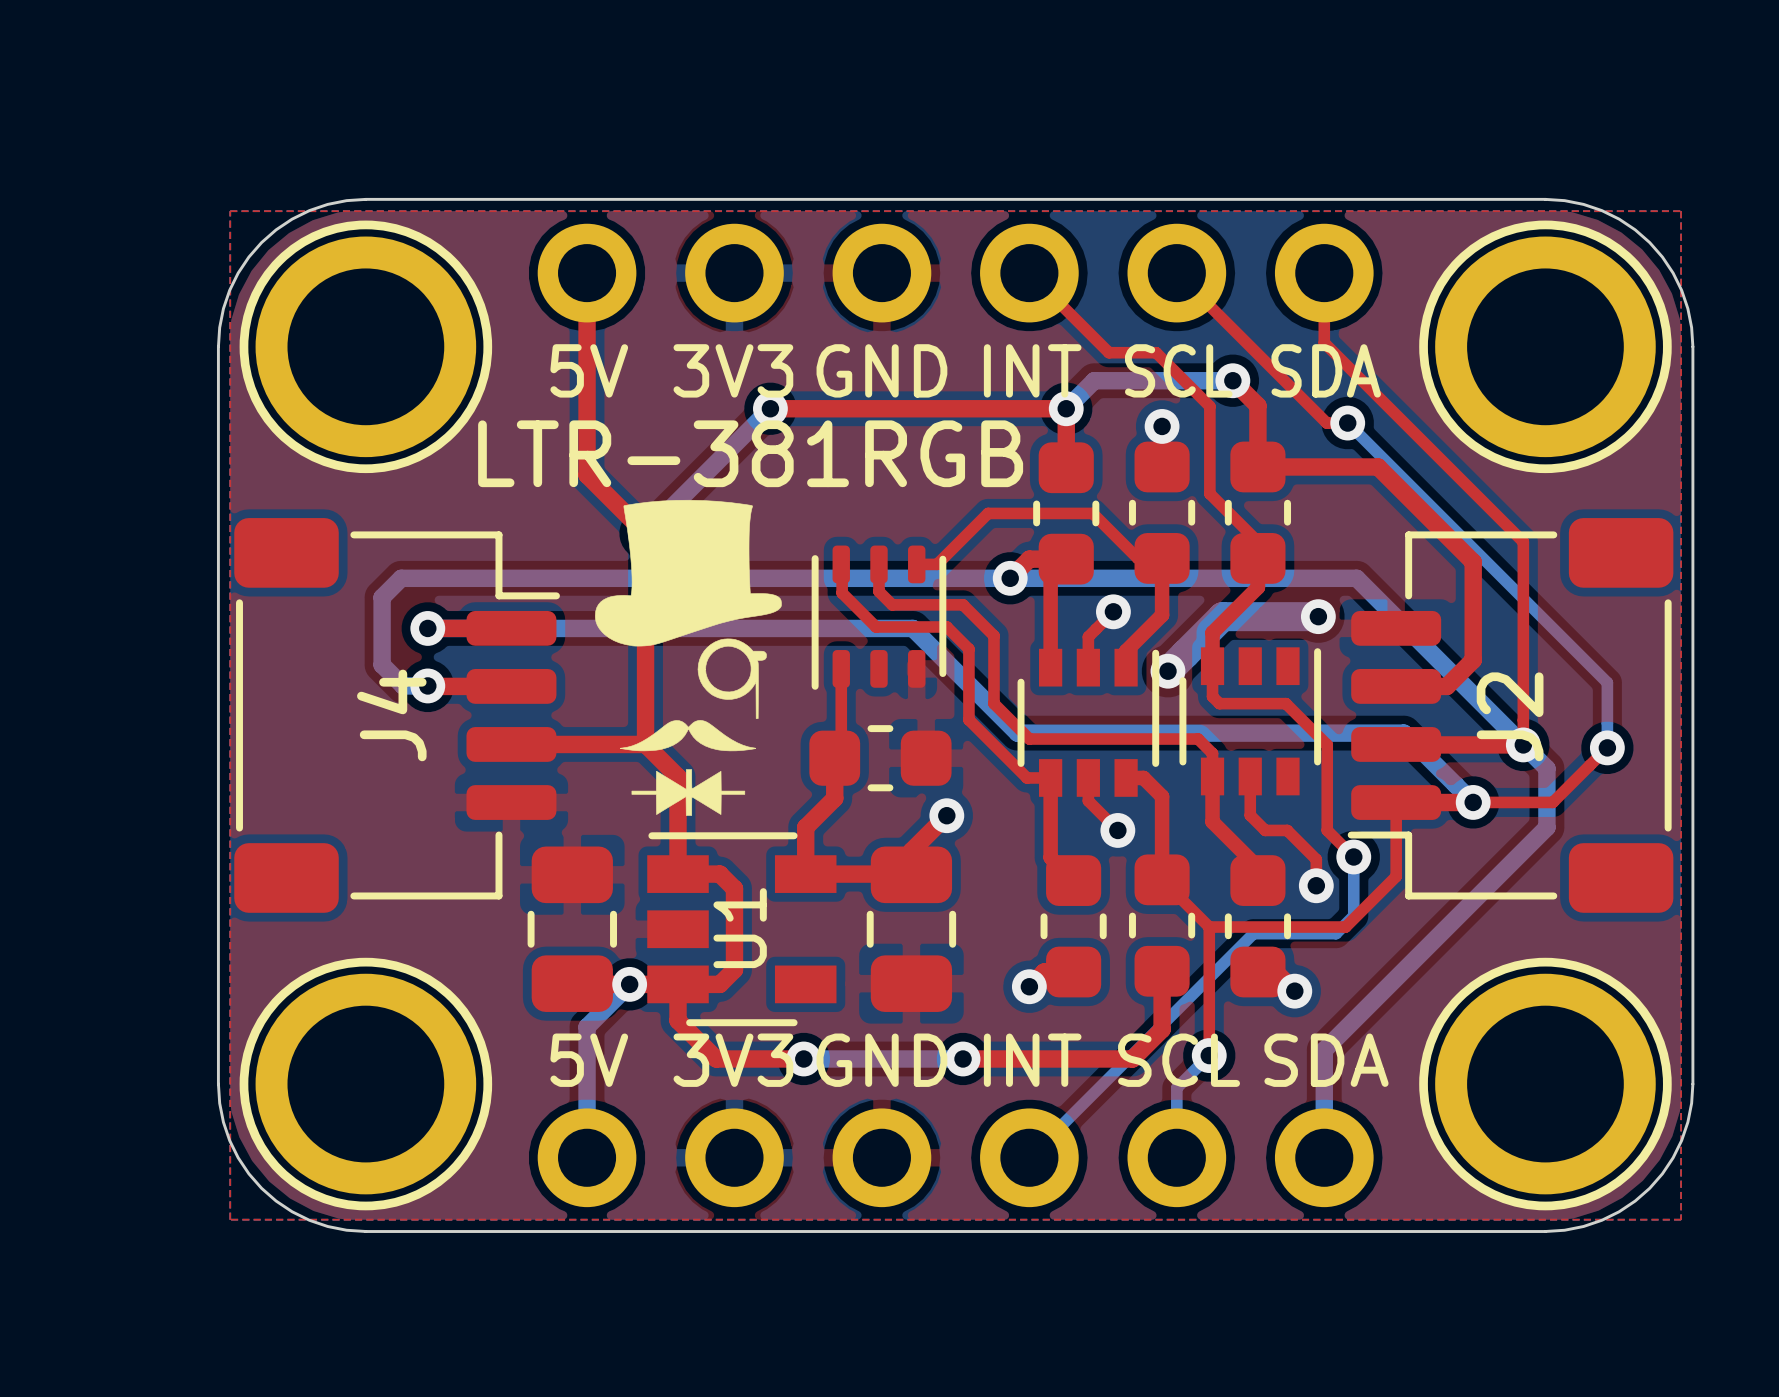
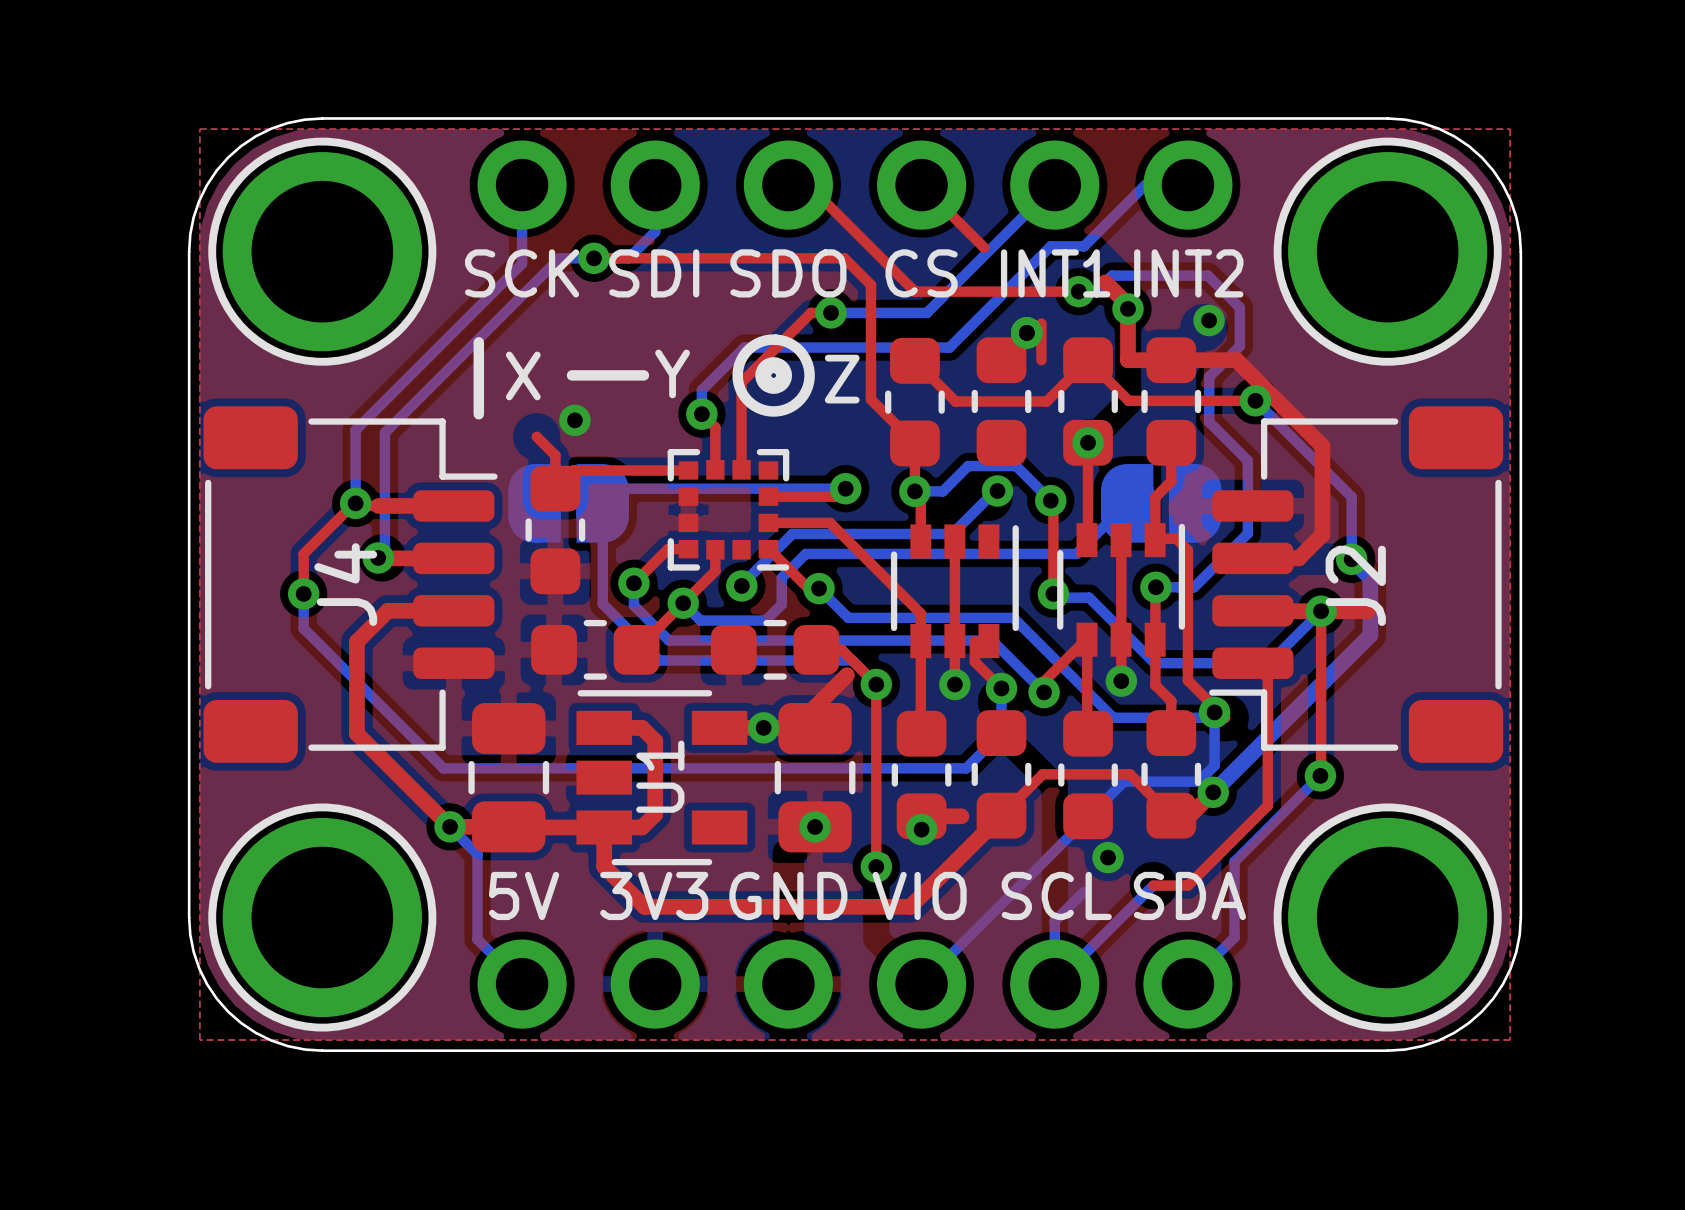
bottom track: none -> (522, 185) (522, 263) (355, 430) (355, 503)
top track: (587, 273) (587, 475) (645, 533) (645, 744) -> none
bottom track: none -> (655, 185) (655, 231) (628, 258) (559, 258) (384, 432) (384, 555) (382, 557)
top track: none -> (788, 185) (808, 185) (914, 291) (1078, 291)
bottom track: none -> (1054, 185) (926, 312) (831, 312)
top track: (1176, 273) (1326, 423) (1347, 423) -> none
bottom track: none -> (1187, 185) (1145, 185) (1084, 246) (1050, 246) (949, 347) (744, 347) (701, 390) (701, 414)
top track: (1324, 273) (1324, 342) (1523, 541) (1523, 744) -> none
top track: (1098, 342) (1109, 352) (1156, 352) (1209, 406) (1209, 493) (1257, 541) (1257, 587) (1212, 632) (1212, 696) (1219, 703) (1285, 703) (1327, 744) (1327, 830) (1353, 856) -> none
top track: none -> (593, 258) (844, 258) (870, 284) (870, 399) (914, 443) (914, 491) (920, 497) (920, 541)
via: none -> (593, 258)
text: 5V (589, 370) -> SCK (522, 273)
text: 3V3 (733, 370) -> SDI (654, 273)
text: GND (881, 370) -> SDO (788, 273)
text: INT (1032, 370) -> CS (921, 273)
text: SCL (1178, 370) -> INT1 (1055, 273)
text: SDA (1326, 370) -> INT2 (1188, 273)
bottom track: (1232, 380) (1094, 380) (1066, 408) -> none
via: (1232, 380) -> none
bottom track: none -> (1078, 291) (1096, 291) (1112, 275) (1207, 275) (1239, 307) (1239, 346) (1209, 376) (1209, 422) (1247, 460) (1247, 533) (1194, 587) (1155, 587)
via: none -> (1078, 291)
bottom track: (770, 408) (645, 533) -> none
top track: (770, 408) (1066, 408) (1066, 467) -> none
via: (770, 408) -> none
via: (1066, 408) -> none
via: none -> (1128, 308)
top track: none -> (831, 312) (811, 312) (741, 382) (741, 469)
via: none -> (831, 312)
bottom track: (1347, 423) (1607, 682) (1607, 747) -> none
via position: (1162, 426) -> (1026, 332)
line: none -> (774, 339) (761, 341) (749, 349) (741, 360) (737, 373) (739, 387) (746, 399) (758, 407) (771, 411) (785, 409) (797, 402) (805, 391) (809, 377) (807, 364) (800, 351) (789, 343) (776, 339)
line: none -> (478, 342) (478, 414)
drawing: none -> [755, 357, 792, 394]
top track: none -> (914, 360) (955, 401) (1046, 401) (1088, 360) (1128, 400) (1255, 400)
text: none -> Y (672, 373)
line: none -> (572, 375) (643, 375)
text: none -> X (523, 375)
text: none -> Z (842, 379)
drawing: [594, 499, 782, 816] -> none
bottom track: none -> (1255, 400) (1351, 497) (1351, 559) (1370, 577) (1370, 635) (1213, 792)
via: none -> (1255, 400)
part: none -> (1001, 401)
part: (1162, 512) -> none
part: none -> (1088, 401)
part: (1257, 512) -> none
part: none -> (1171, 401)
part: none -> (914, 402)
part: (1066, 513) -> none
top track: none -> (701, 414) (715, 427) (715, 469)
via: none -> (701, 414)
top track: none -> (536, 436) (555, 455) (555, 488) (573, 470) (688, 470)
top track: none -> (1088, 442) (1087, 538)
via: none -> (1088, 442)
top track: none -> (1171, 442) (1171, 481) (1155, 497) (1155, 538) (1176, 538) (1187, 550) (1187, 680) (1225, 717)
top track: (841, 564) (842, 593) (876, 626) (946, 626) (968, 649) (968, 719) (1027, 777) (1050, 777) (1050, 857) (1073, 880) -> none
top track: (878, 564) (878, 591) (892, 604) (963, 604) (993, 635) (993, 703) (1029, 739) (1198, 739) (1212, 753) (1212, 821) (1257, 867) (1257, 880) -> none
top track: (916, 564) (937, 564) (988, 513) (1092, 513) (1137, 558) (1162, 558) (1162, 615) (1126, 651) (1126, 667) -> none
top track: (1010, 578) (1029, 559) (1066, 559) (1050, 574) (1050, 667) -> none
via position: (1010, 578) -> (914, 491)
bottom track: none -> (845, 488) (617, 488) (602, 503) (602, 604) (659, 660) (852, 660) (876, 684)
top track: none -> (845, 488) (837, 496) (768, 496)
via: none -> (845, 488)
top track: (1113, 611) (1088, 636) (1088, 667) -> none
bottom track: none -> (914, 491) (942, 491) (968, 466) (1016, 466) (1050, 500)
bottom track: (1318, 616) (1222, 616) (1167, 671) -> none
via: (1318, 616) -> none
LTR-381RGB: (878, 617) -> none
bottom track: none -> (988, 497) (952, 533) (792, 533) (741, 585)
top track: none -> (1050, 500) (1053, 503) (1053, 593)
via: none -> (1050, 500)
part: none -> (568, 503)
bottom track: none -> (1127, 503) (1076, 553) (805, 553) (781, 577) (781, 604) (765, 620) (700, 620) (683, 603)
part: none -> (1161, 503)
bottom track: (427, 628) (912, 628) (1017, 733) (1403, 733) (1473, 802) -> none
top track: none -> (378, 505) (351, 505) (303, 553) (303, 593)
via position: (427, 628) -> (355, 503)
part: none -> (728, 509)
top track: none -> (768, 522) (830, 522) (920, 613) (921, 733)
part: none -> (555, 529)
top track: none -> (1121, 538) (1121, 681)
top track: none -> (954, 541) (954, 684)
top track: (841, 668) (841, 751) (834, 757) (834, 798) (805, 827) (805, 874) -> none
via: (1167, 671) -> none
top track: none -> (688, 549) (668, 549) (633, 583)
top track: none -> (715, 549) (715, 571) (636, 649)
top track: none -> (769, 549) (808, 588) (819, 588)
bottom track: (427, 685) (403, 685) (382, 664) (382, 597) (401, 578) (1356, 578) (1546, 768) (1546, 827) (1324, 1050) (1324, 1157) -> (1320, 775) (1234, 861) (1234, 937) (1187, 984)
via: none -> (1351, 559)
bottom track: none -> (633, 583) (633, 605) (668, 640) (992, 640) (1044, 692)
via: none -> (633, 583)
via: none -> (741, 585)
top track: none -> (1155, 587) (1155, 685) (1171, 701) (1171, 733)
via: none -> (1155, 587)
bottom track: none -> (819, 588) (848, 617) (1013, 617) (1113, 717) (1225, 717)
via: none -> (819, 588)
part position: (1088, 722) -> (954, 591)
bottom track: none -> (303, 593) (303, 628) (443, 768) (966, 768) (1001, 733) (1001, 701)
via: none -> (303, 593)
bottom track: none -> (1053, 593) (1057, 597) (1089, 597) (1154, 663) (1269, 663) (1321, 611)
via: none -> (1053, 593)
via: none -> (683, 603)
top track: (511, 744) (645, 744) -> (453, 610) (387, 610) (356, 641) (356, 733) (450, 826) (508, 826)
top track: (645, 744) (678, 776) (678, 874) -> none
top track: none -> (1321, 611) (1321, 777)
via: none -> (1321, 611)
via: (1523, 744) -> none
top track: (1607, 747) (1552, 802) (1396, 802) (1396, 876) (1345, 927) (1209, 927) -> none
via: (1607, 747) -> none
part position: (880, 758) -> (775, 649)
top track: (1250, 776) (1250, 815) (1265, 830) (1287, 830) (1316, 859) (1316, 885) -> none
top track: (1126, 777) (1143, 777) (1162, 796) (1162, 879) (1209, 927) -> none
part: none -> (595, 649)
top track: none -> (816, 649) (841, 649) (876, 684) (876, 866) (884, 858)
top track: none -> (1252, 663) (1267, 678) (1267, 805) (1187, 885) (1153, 885)
via: (1473, 802) -> none
via position: (946, 815) -> (876, 684)
via: none -> (1121, 681)
via: none -> (954, 684)
via: none -> (1044, 692)
top track: none -> (1046, 692) (1044, 692) (1044, 681) (1087, 638) (1088, 733)
via: none -> (763, 727)
via: (1316, 885) -> none
part: none -> (1001, 774)
part: (1162, 925) -> none
part: none -> (1171, 774)
part: none -> (921, 775)
part: (1073, 926) -> none
part: none -> (1088, 775)
part: (1257, 926) -> none
top track: (1209, 927) (1209, 1055) -> none
via: none -> (1320, 775)
via: none -> (1213, 792)
top track: (1162, 971) (1162, 1029) (1132, 1058) (963, 1058) -> none
via: none -> (815, 826)
bottom track: (629, 984) (587, 1027) (587, 1157) -> (450, 826) (477, 854) (477, 939) (522, 984)
via position: (629, 984) -> (450, 826)
via: (1294, 991) -> none
via: none -> (1108, 857)
top track: (678, 1020) (716, 1058) (803, 1058) -> (604, 860) (604, 866) (644, 906) (910, 906) (1042, 774) (1129, 774) (1171, 815) (1189, 815) (1213, 792)
bottom track: none -> (1153, 885) (1054, 984)
via: (1209, 1055) -> none
bottom track: (803, 1058) (963, 1058) -> none
via: (803, 1058) -> none
via position: (963, 1058) -> (876, 866)
text: INT (1032, 1060) -> VIO (919, 895)

